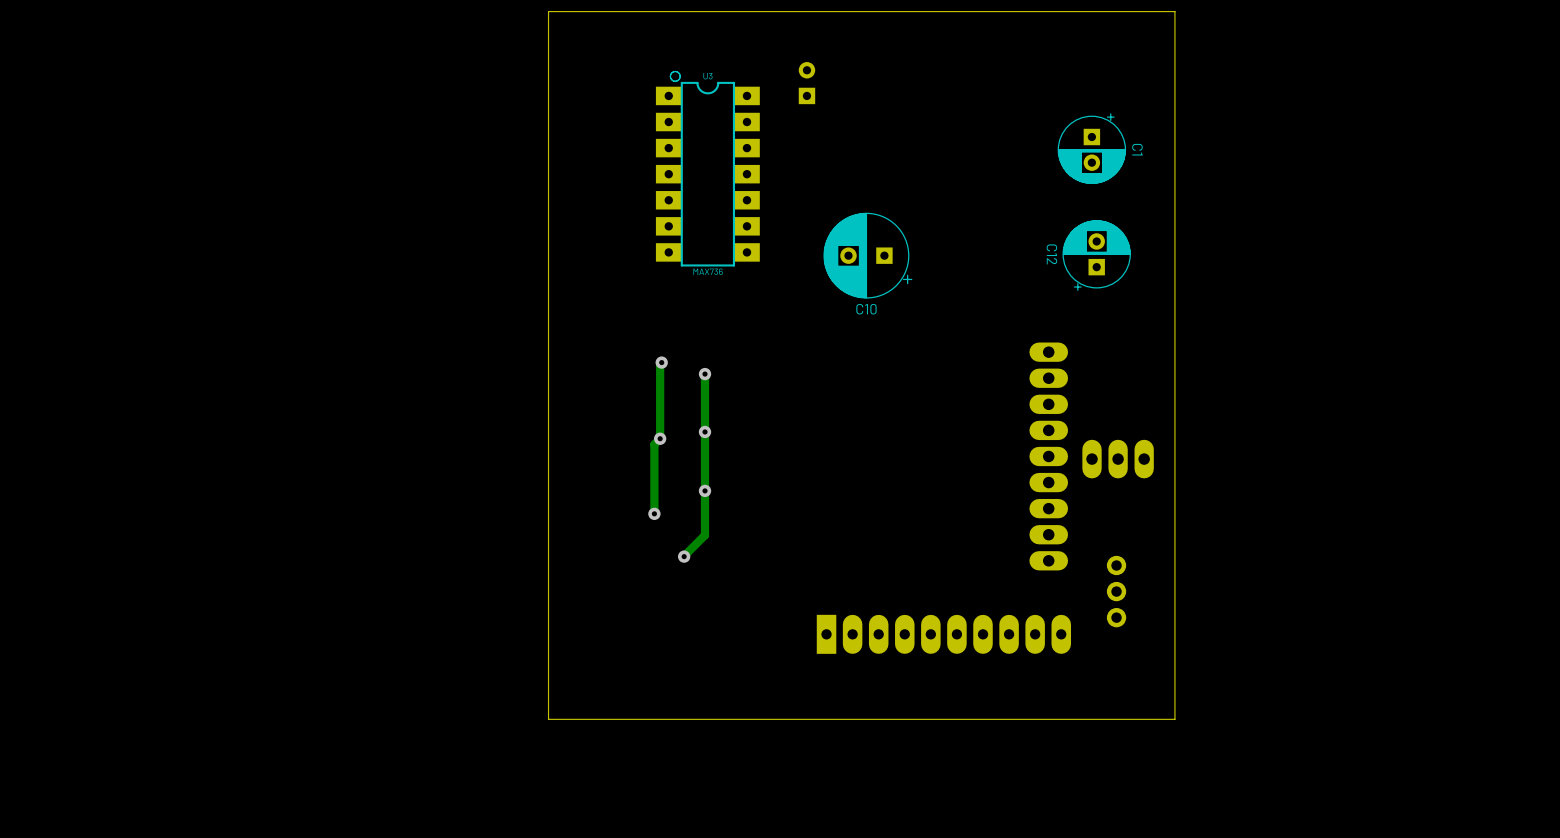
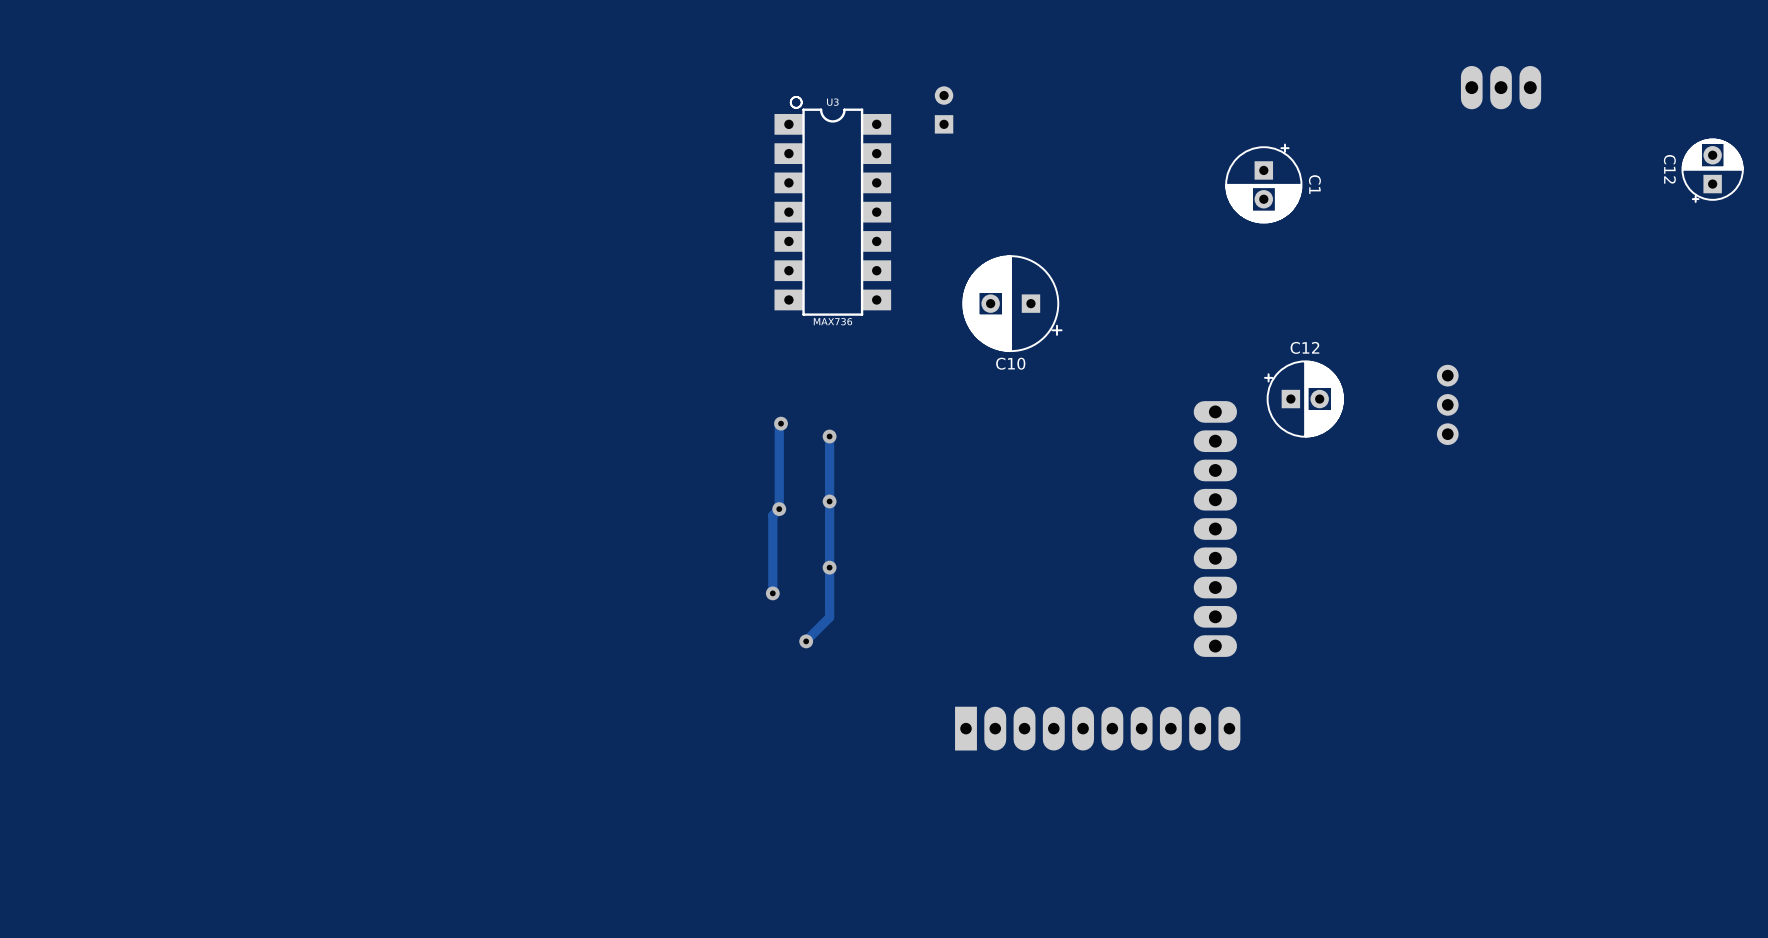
board edge: (1174, 11) (1174, 719) (548, 719) (548, 11) (1174, 11) -> none
part: none -> (1501, 87)
C12: none -> (1712, 170)
C12 rotation: 0° (1096, 255) -> 90° clockwise (1303, 399)
C12 position: (1096, 255) -> (1303, 399)
part: none -> (1447, 404)
part: (1118, 459) -> none
part: (1116, 591) -> none

